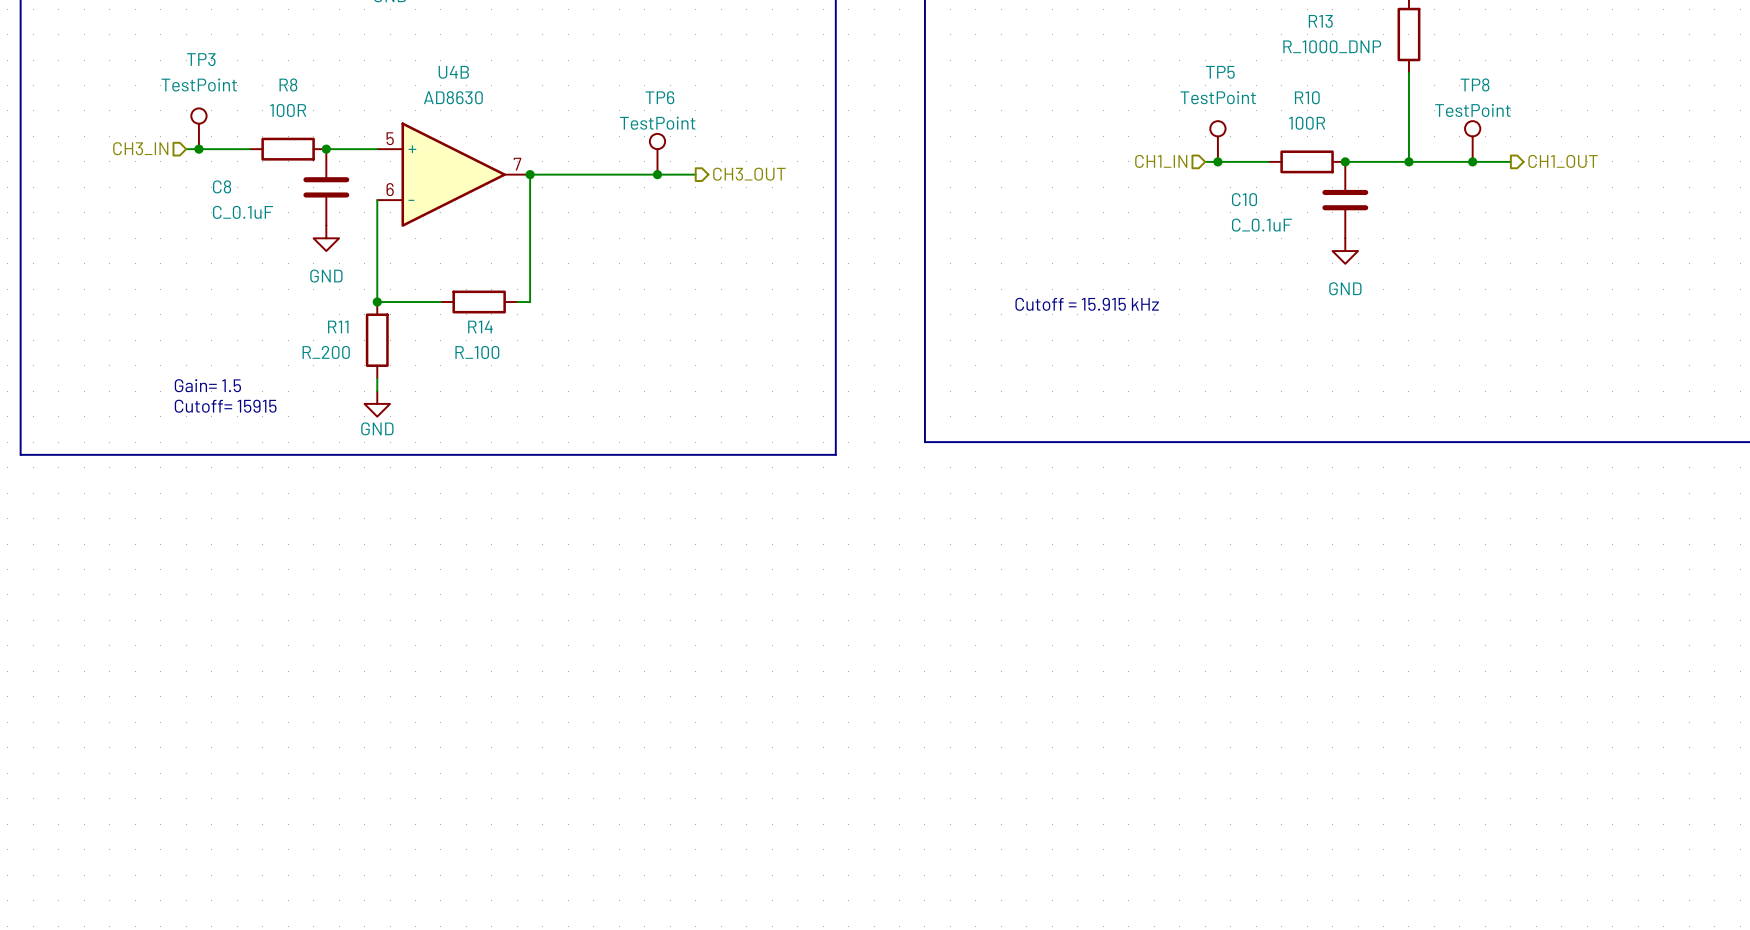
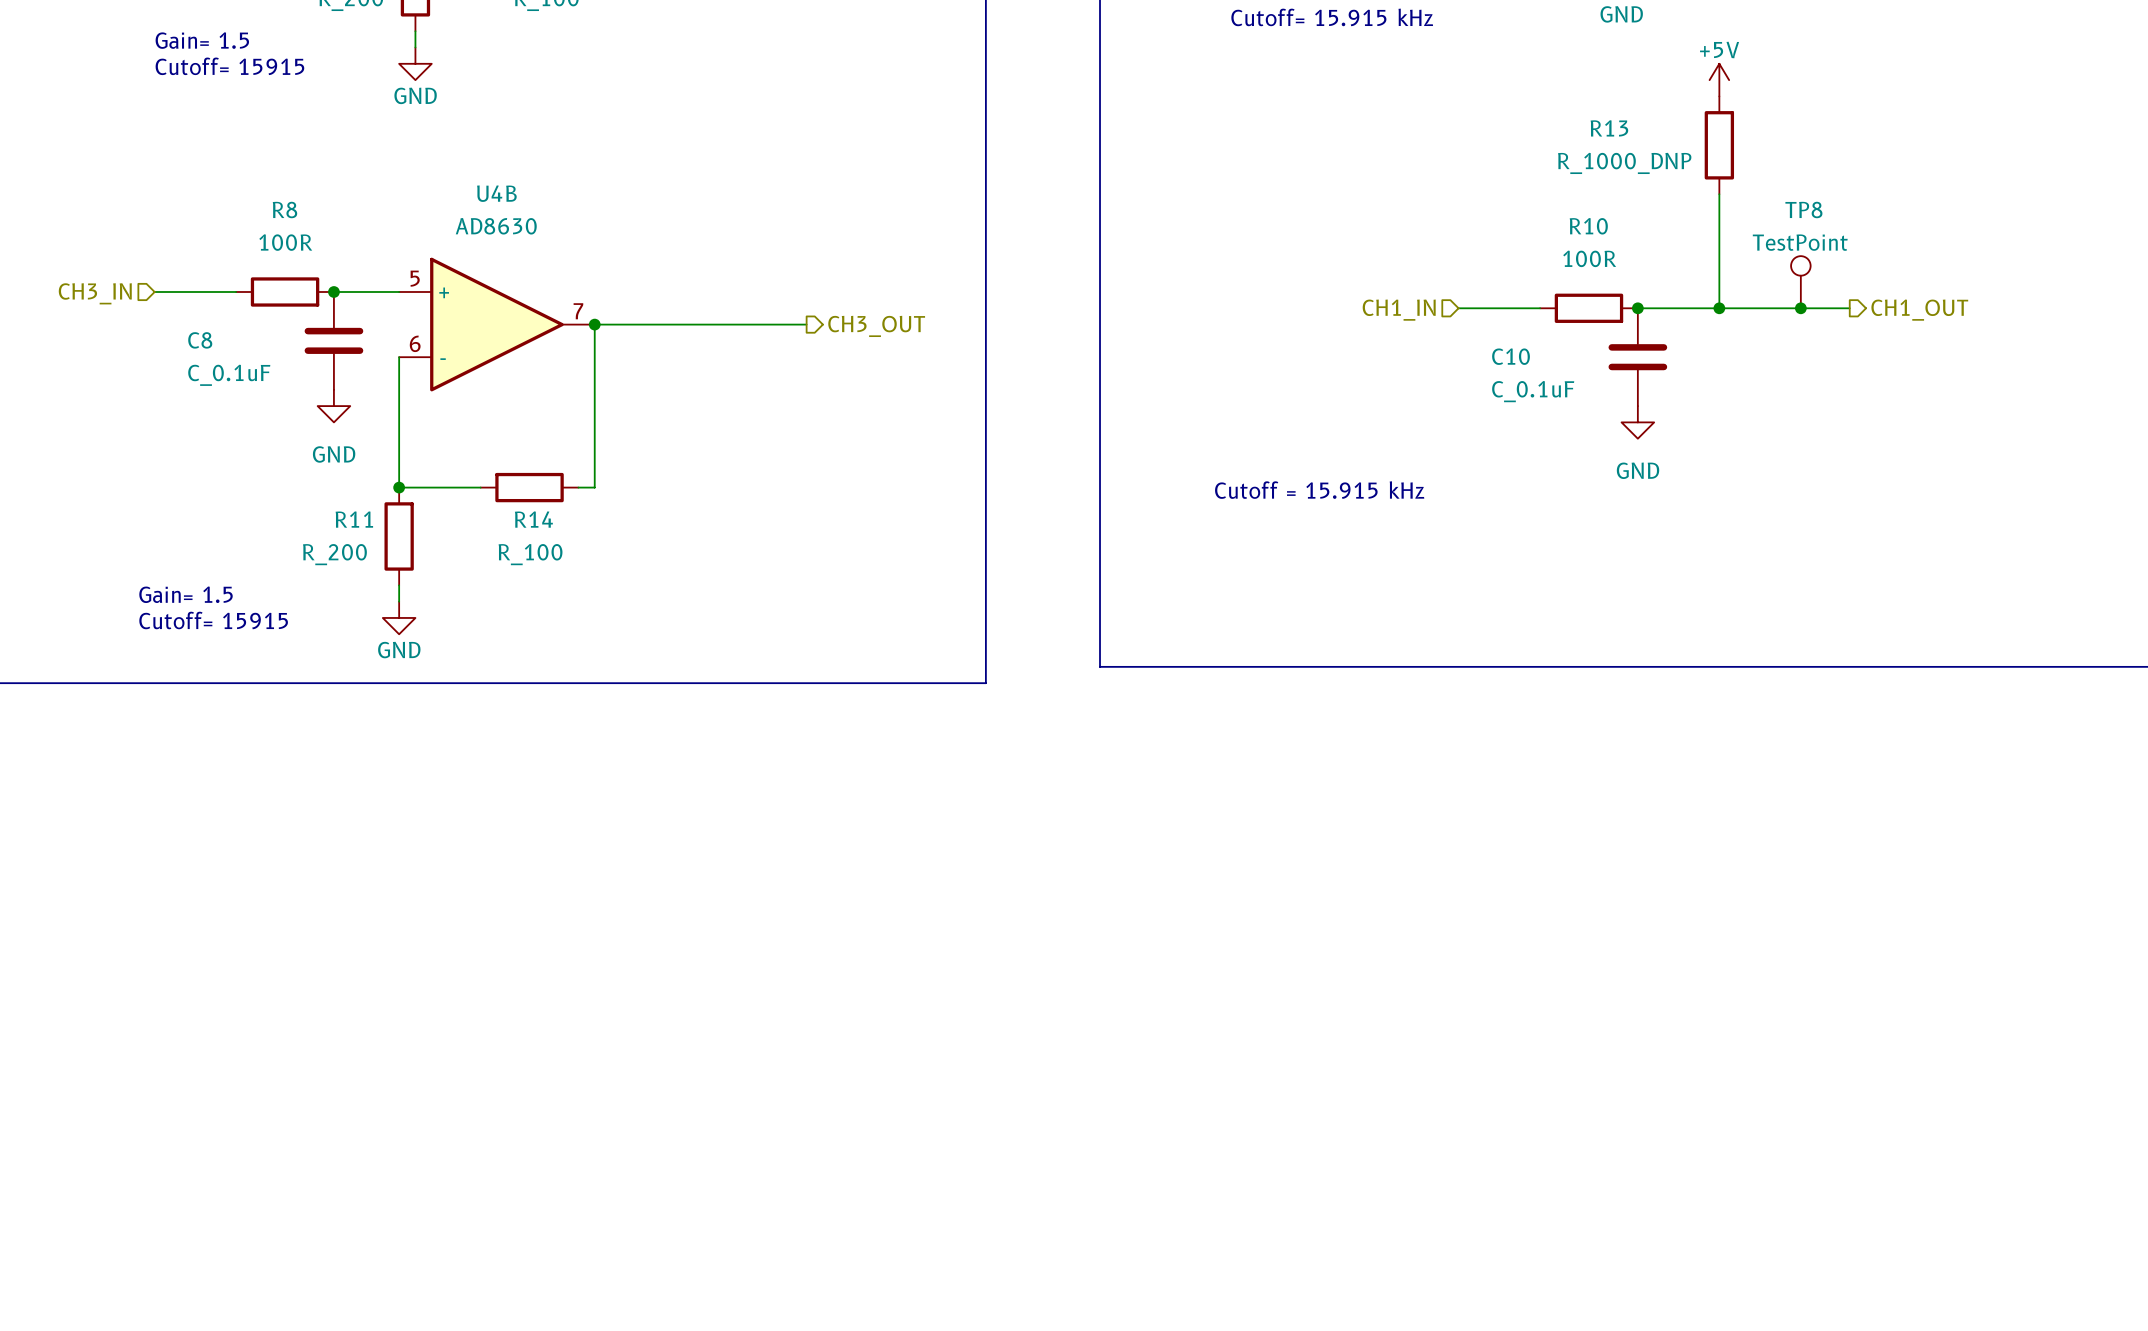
TP3: TestPoint (198, 128) -> none
TP5: TestPoint (1217, 141) -> none
junction: (198, 149) -> none
TP6: TestPoint (657, 154) -> none
junction: (1217, 161) -> none
junction: (657, 174) -> none

